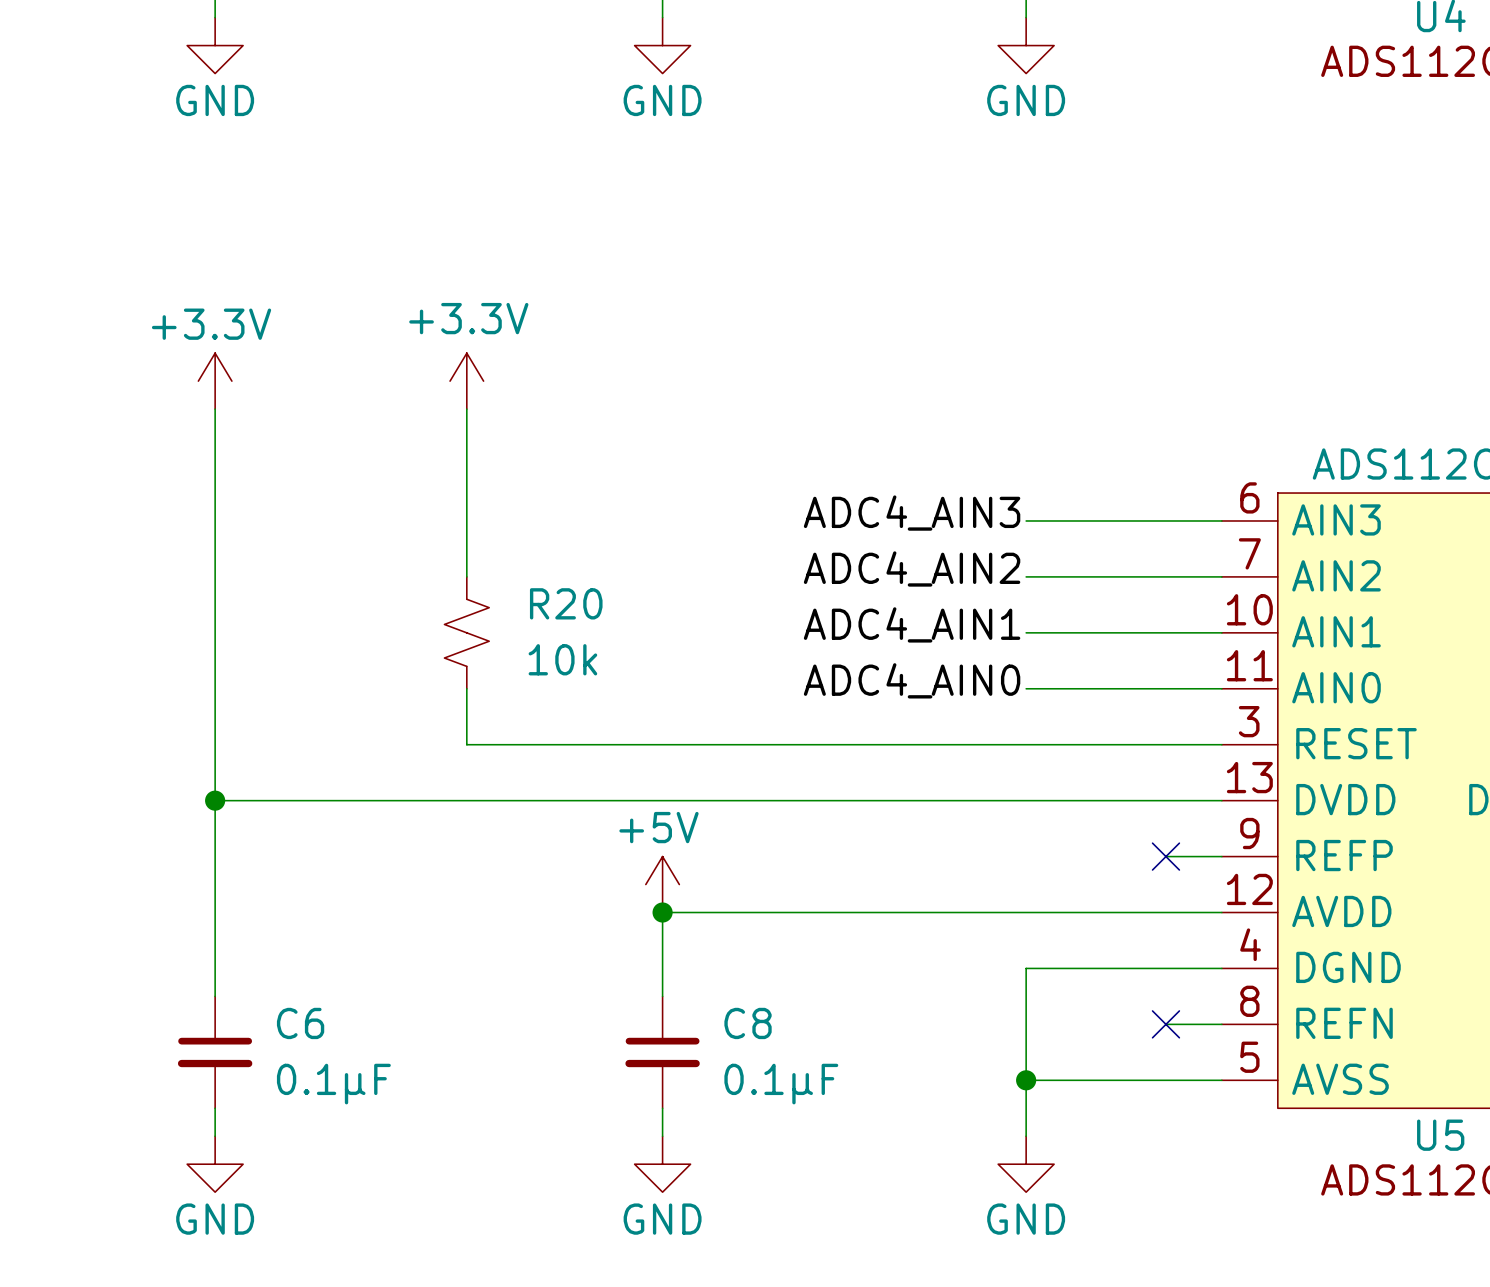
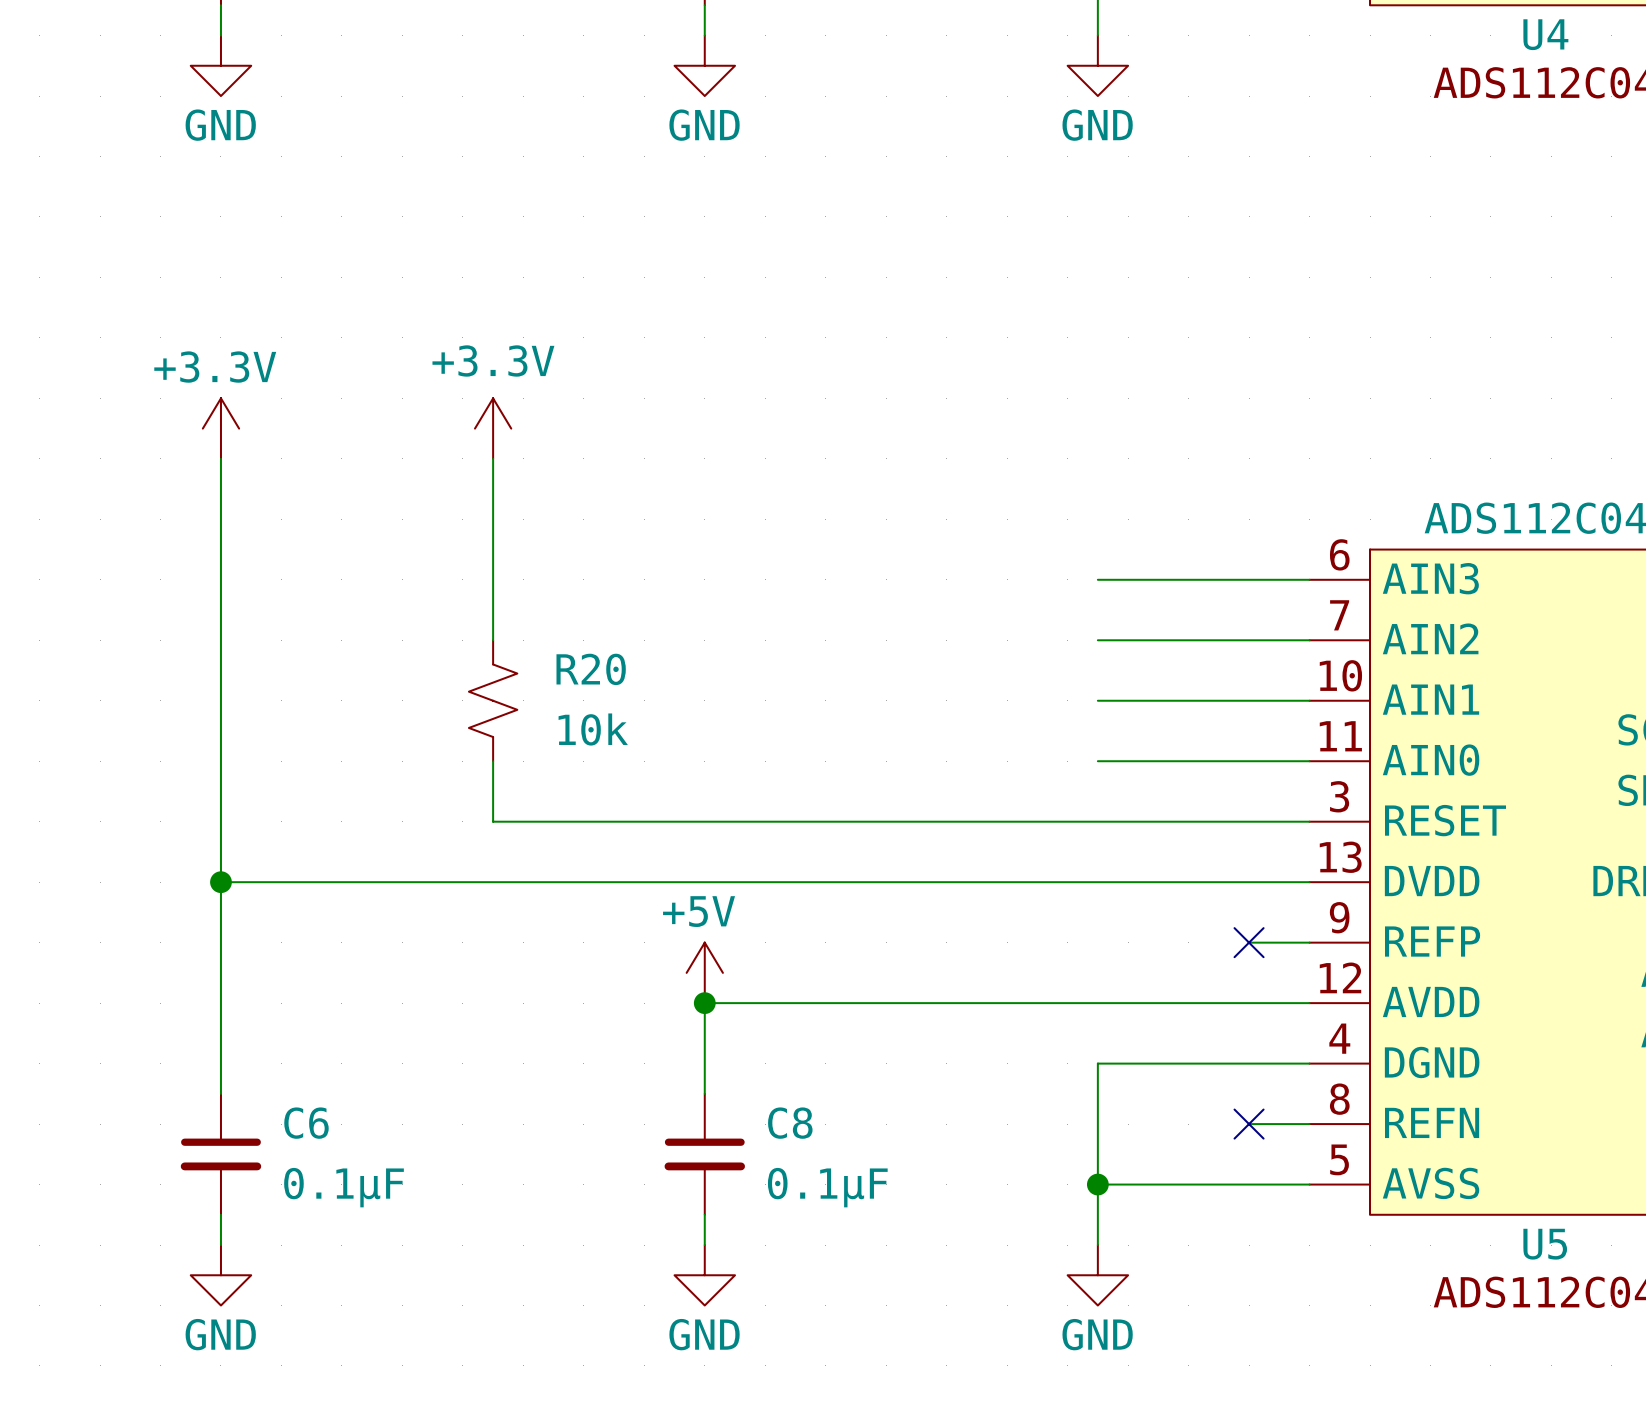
label: ADC4_AIN3 (912, 513) -> none
label: ADC4_AIN2 (912, 568) -> none
label: ADC4_AIN1 (912, 624) -> none
label: ADC4_AIN0 (912, 680) -> none

